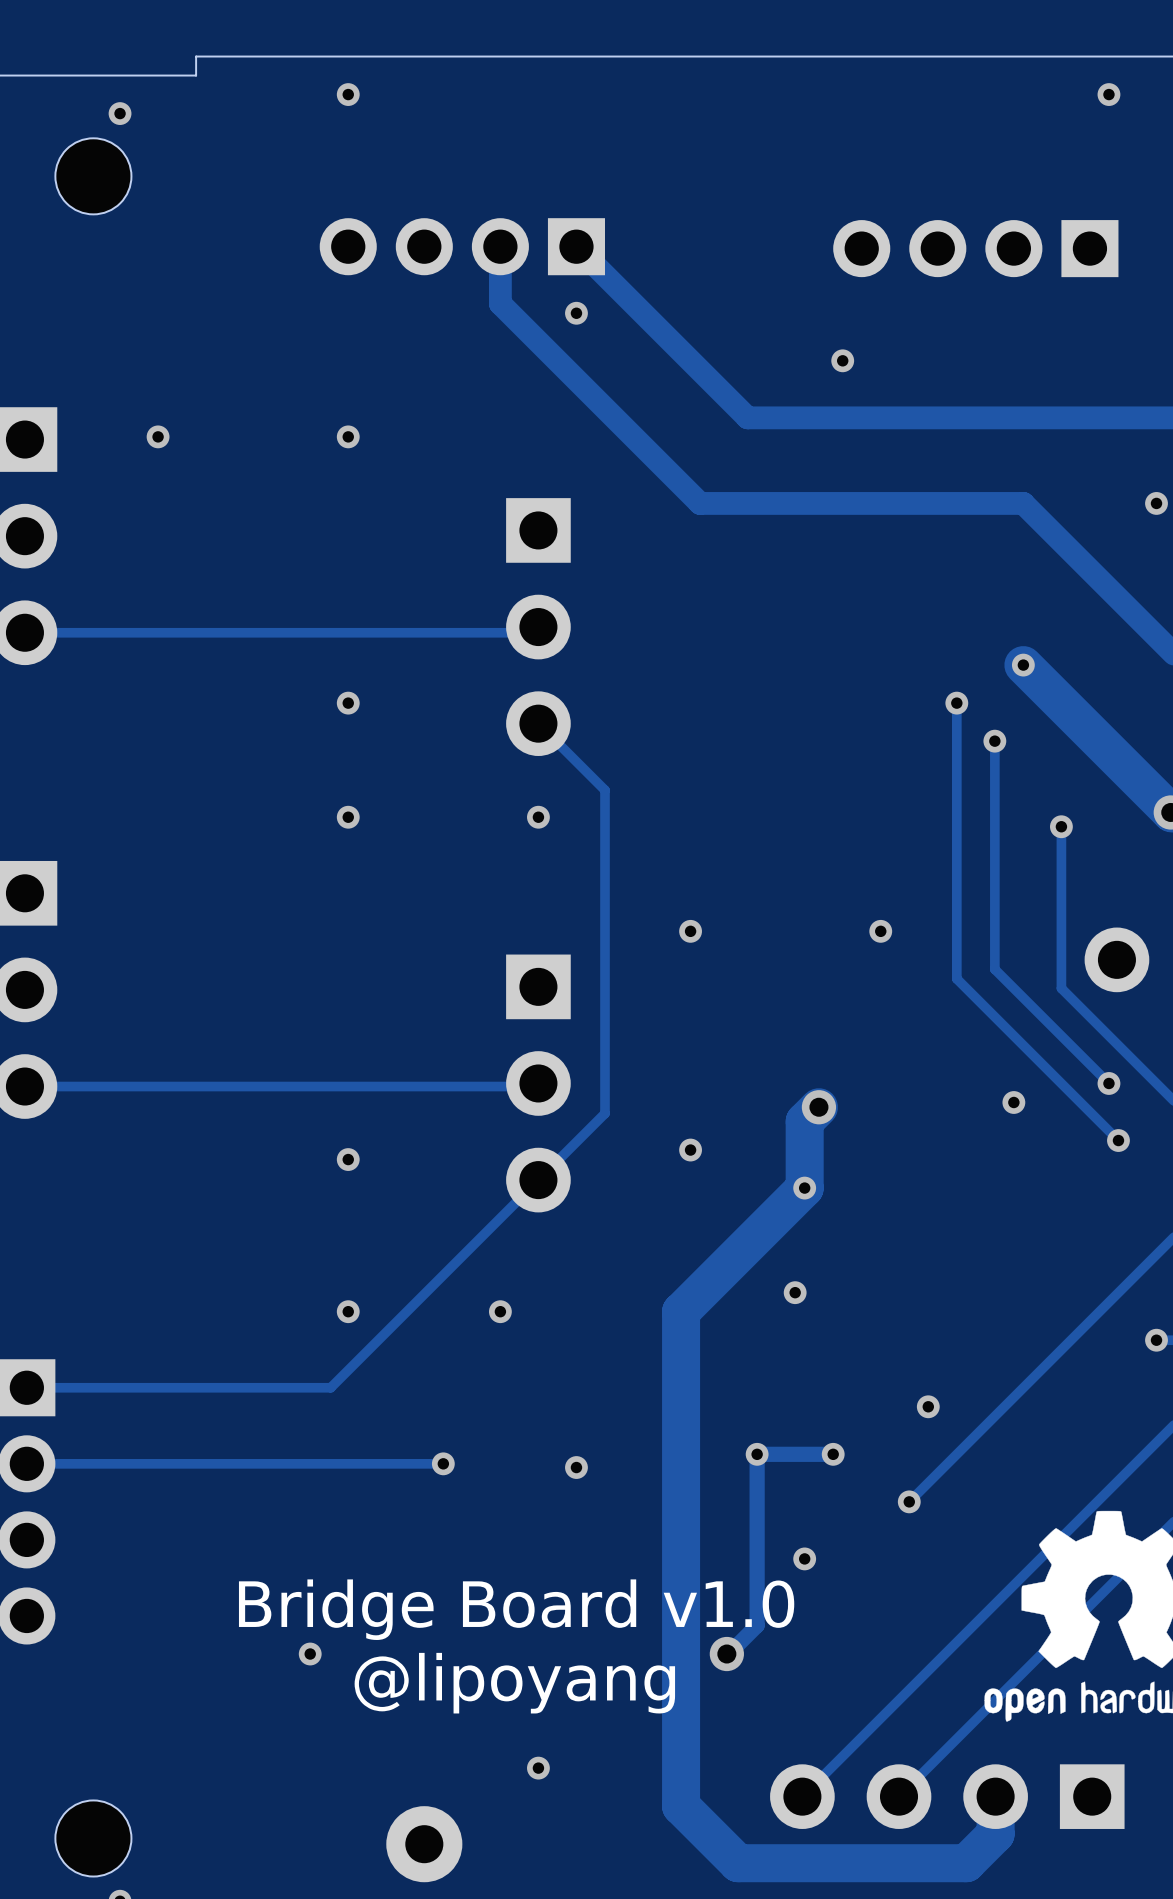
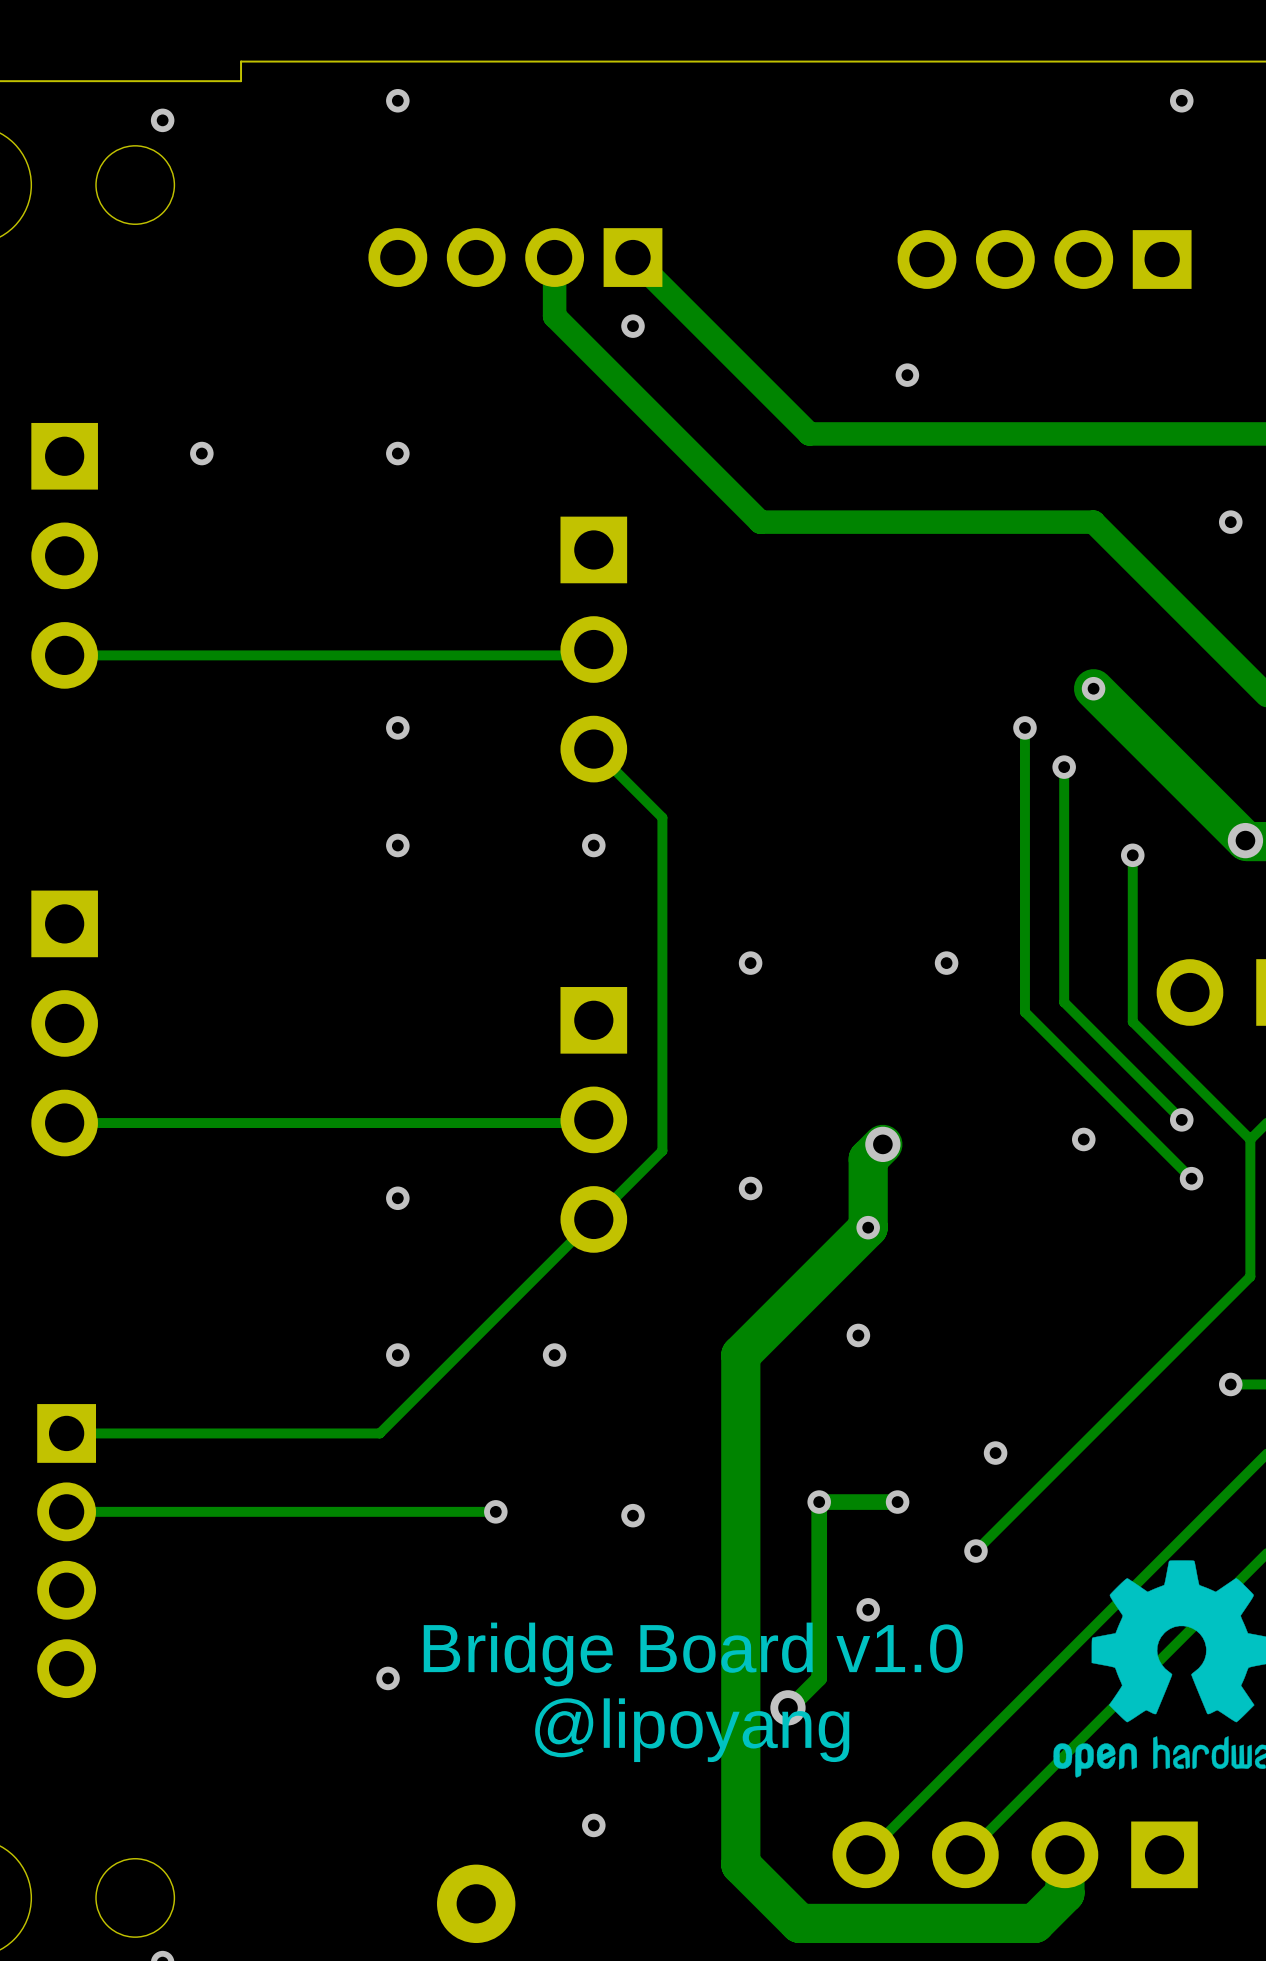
text position: Bridge Board v1.0 (516, 1609) -> Bridge Board v1.0 (693, 1654)
via position: (310, 1654) -> (388, 1678)
text position: @lipoyang (514, 1683) -> @lipoyang (692, 1730)

